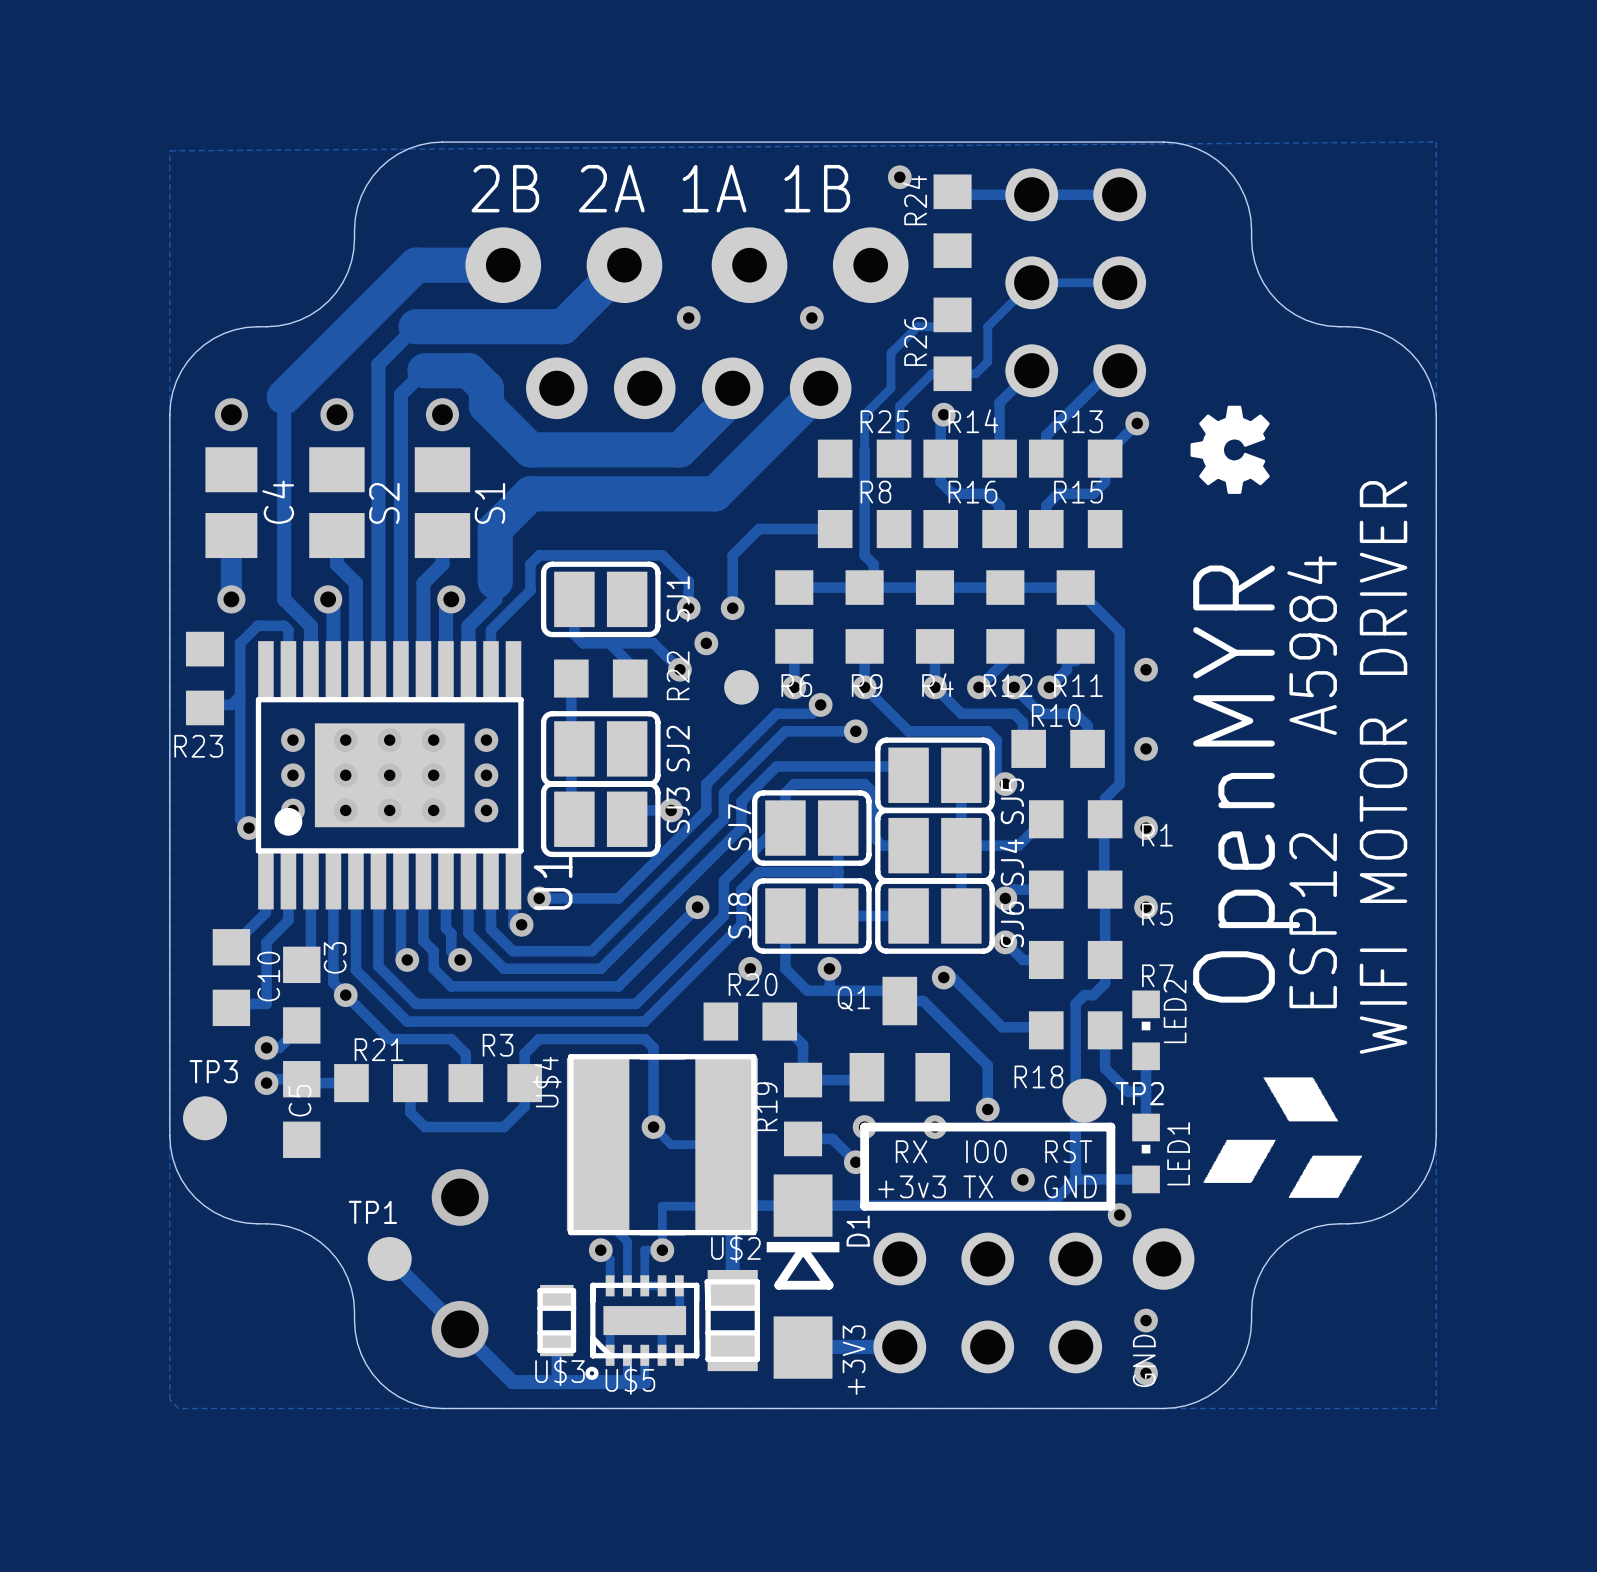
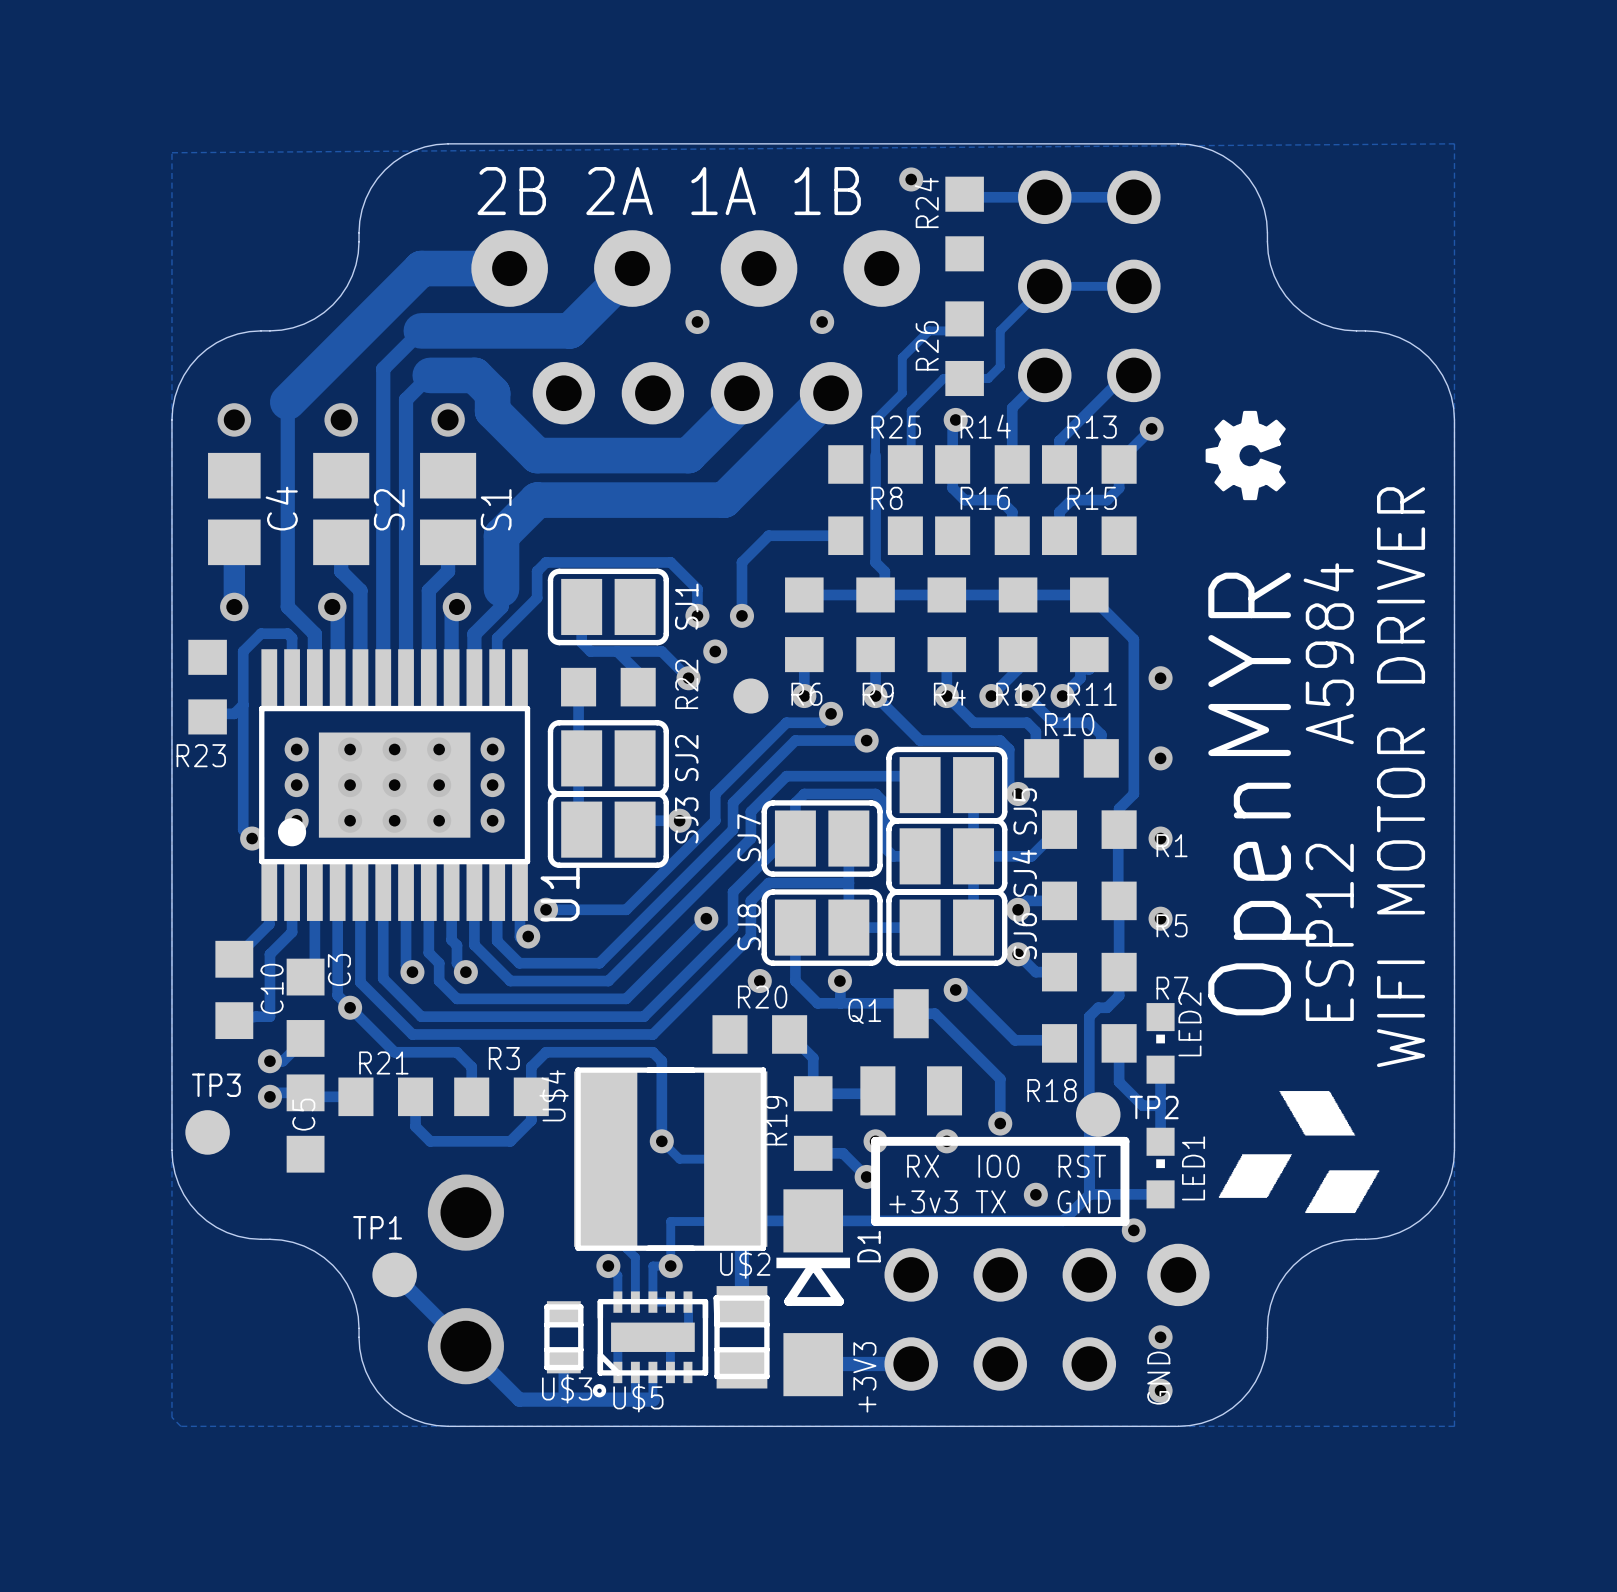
via size: [431, 1169, 489, 1226] -> [427, 1174, 504, 1251]
via size: [431, 1300, 489, 1358] -> [427, 1308, 504, 1385]

